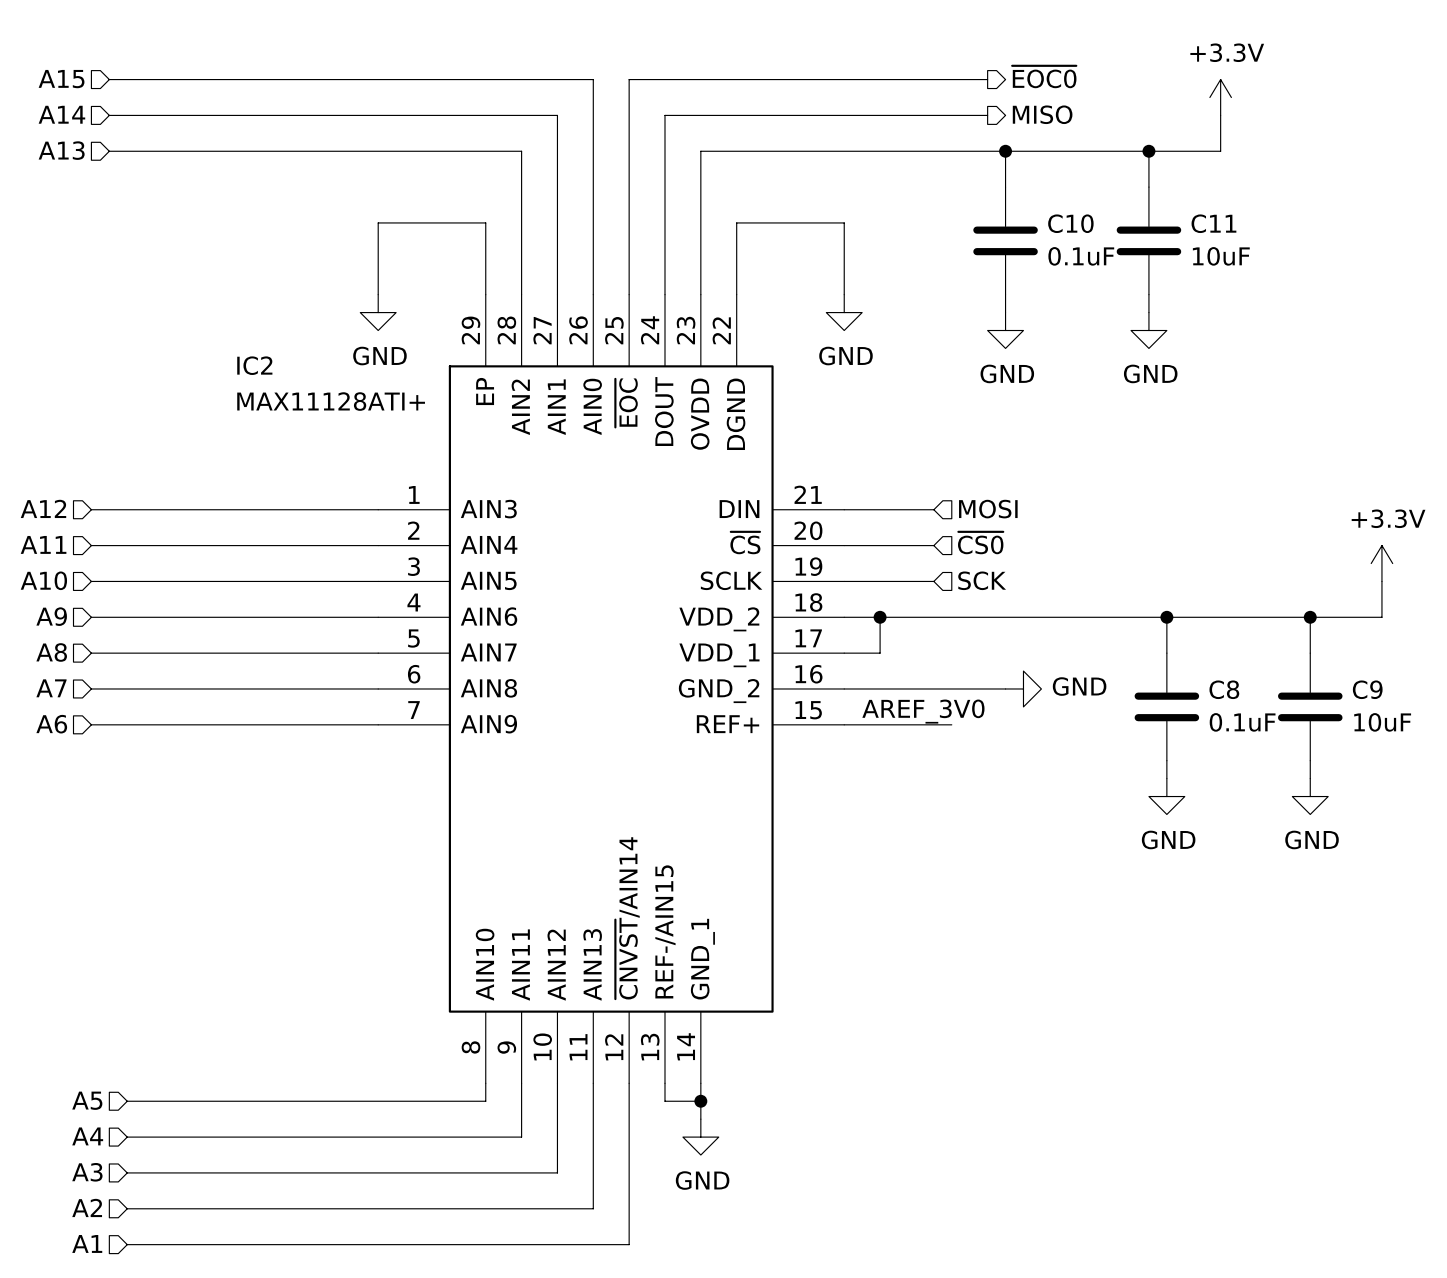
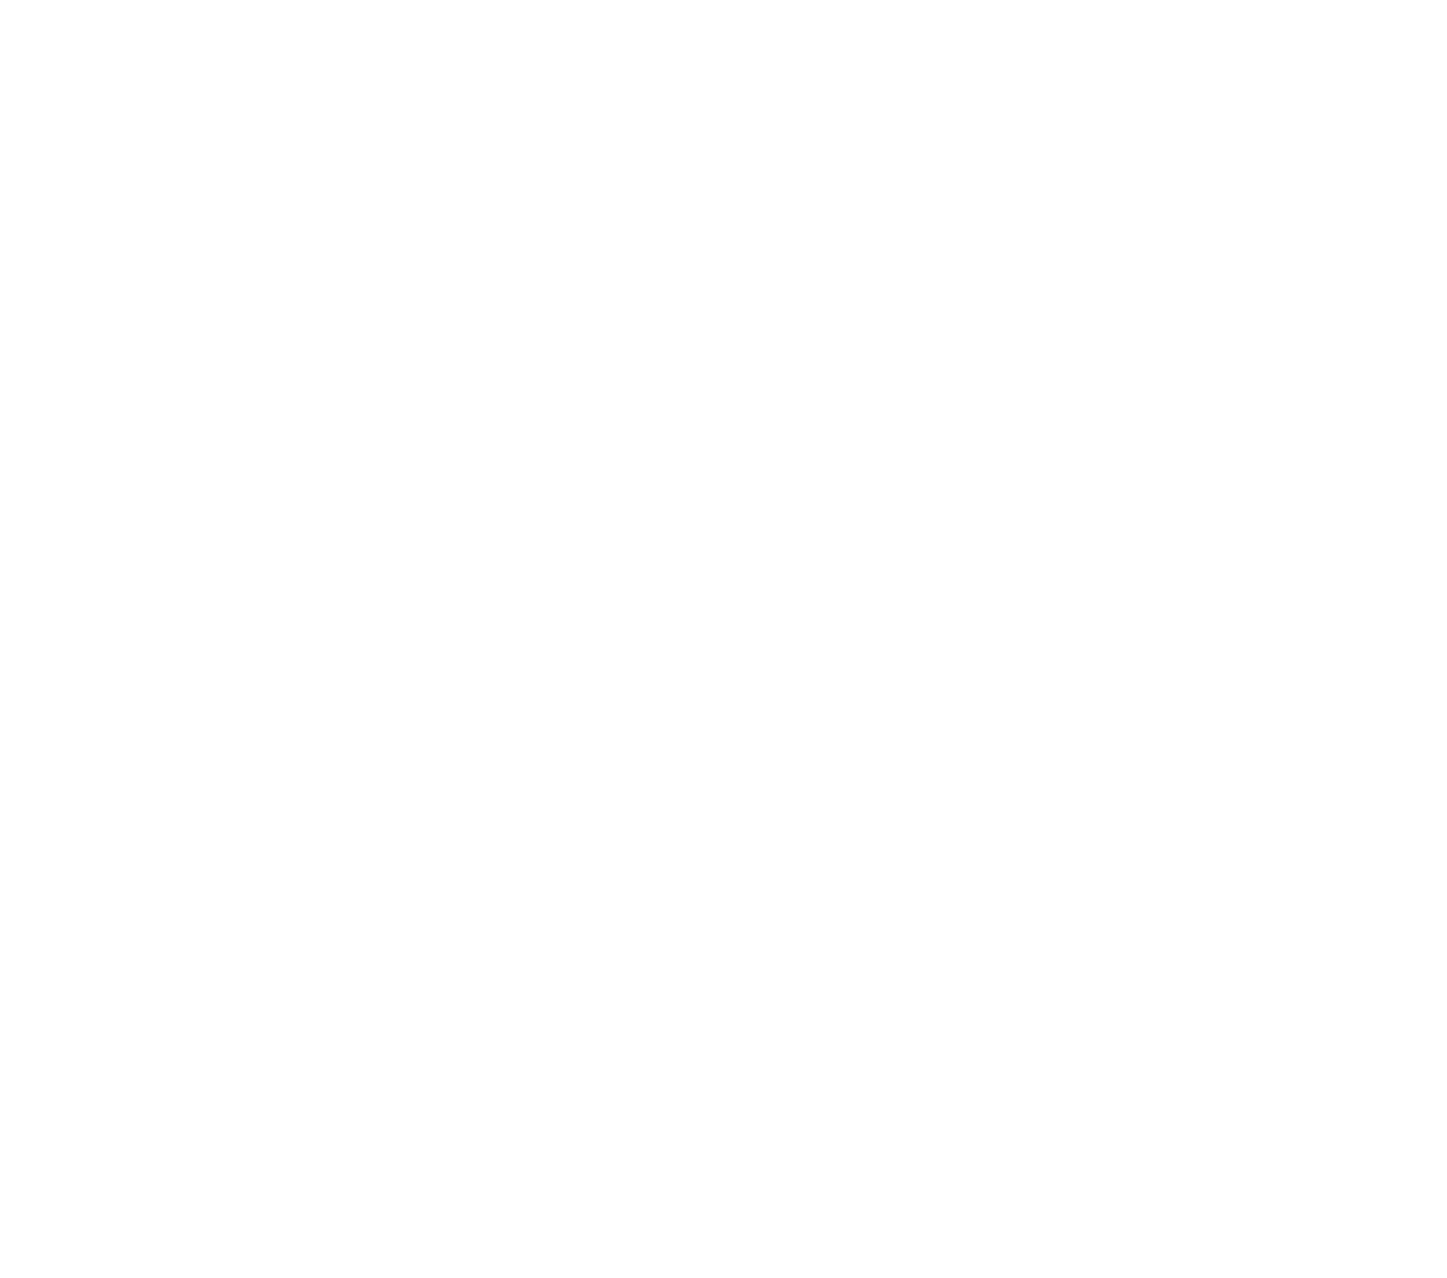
hierarchical label: ~{EOC0} (1044, 77) -> none
hierarchical label: A15 (61, 79) -> none
wire: (109, 79) (593, 79) (593, 294) -> none
wire: (987, 79) (629, 79) (629, 294) -> none
power symbol: +3.3V (1220, 97) -> none
hierarchical label: A14 (61, 114) -> none
hierarchical label: MISO (1042, 114) -> none
wire: (109, 115) (557, 115) (557, 294) -> none
wire: (987, 115) (664, 115) (664, 294) -> none
wire: (1220, 115) (1220, 151) (700, 151) (700, 294) -> none
hierarchical label: A13 (61, 150) -> none
wire: (109, 151) (521, 151) (521, 294) -> none
wire: (1005, 151) (1005, 187) -> none
junction: (1005, 151) -> none
wire: (1148, 151) (1148, 187) -> none
junction: (1148, 151) -> none
C10: 0.1uF (1005, 240) -> none
C11: 10uF (1148, 240) -> none
wire: (378, 294) (378, 222) (485, 222) (485, 294) -> none
wire: (736, 294) (736, 222) (844, 222) (844, 294) -> none
wire: (1005, 294) (1005, 312) -> none
wire: (1148, 294) (1148, 312) -> none
power symbol: GND (378, 312) -> none
power symbol: GND (844, 312) -> none
power symbol: GND (1005, 330) -> none
power symbol: GND (1148, 330) -> none
hierarchical label: A12 (43, 508) -> none
wire: (91, 509) (378, 509) -> none
wire: (844, 509) (933, 509) -> none
hierarchical label: MOSI (988, 509) -> none
hierarchical label: ~{CS0} (980, 543) -> none
hierarchical label: A11 (43, 544) -> none
wire: (91, 545) (378, 545) -> none
wire: (844, 545) (933, 545) -> none
power symbol: +3.3V (1381, 563) -> none
hierarchical label: A10 (43, 580) -> none
hierarchical label: SCK (982, 580) -> none
wire: (91, 581) (378, 581) -> none
wire: (844, 581) (933, 581) -> none
wire: (1381, 581) (1381, 617) (844, 617) -> none
hierarchical label: A9 (51, 616) -> none
wire: (91, 617) (378, 617) -> none
wire: (880, 617) (880, 653) (844, 653) -> none
junction: (880, 617) -> none
wire: (1166, 617) (1166, 653) -> none
junction: (1166, 617) -> none
wire: (1310, 617) (1310, 653) -> none
junction: (1310, 617) -> none
hierarchical label: A8 (51, 652) -> none
wire: (91, 653) (378, 653) -> none
hierarchical label: A7 (51, 688) -> none
wire: (91, 688) (378, 688) -> none
IC2: MAX11128ATI+ (611, 688) -> none
wire: (844, 688) (1005, 688) -> none
power symbol: GND (1023, 688) -> none
C8: 0.1uF (1166, 706) -> none
C9: 10uF (1310, 706) -> none
label: AREF_3V0 (923, 711) -> none
hierarchical label: A6 (51, 724) -> none
wire: (91, 724) (378, 724) -> none
wire: (844, 724) (951, 724) -> none
wire: (1166, 760) (1166, 778) -> none
wire: (1310, 760) (1310, 778) -> none
power symbol: GND (1166, 796) -> none
power symbol: GND (1310, 796) -> none
wire: (485, 1083) (485, 1101) (127, 1101) -> none
wire: (521, 1083) (521, 1137) (127, 1137) -> none
wire: (557, 1083) (557, 1172) (127, 1172) -> none
wire: (593, 1083) (593, 1208) (127, 1208) -> none
wire: (629, 1083) (629, 1244) (127, 1244) -> none
wire: (664, 1083) (664, 1101) (700, 1101) -> none
wire: (700, 1083) (700, 1119) -> none
hierarchical label: A5 (87, 1100) -> none
junction: (700, 1101) -> none
hierarchical label: A4 (87, 1136) -> none
power symbol: GND (700, 1137) -> none
hierarchical label: A3 (87, 1172) -> none
hierarchical label: A2 (87, 1207) -> none
hierarchical label: A1 (87, 1243) -> none

